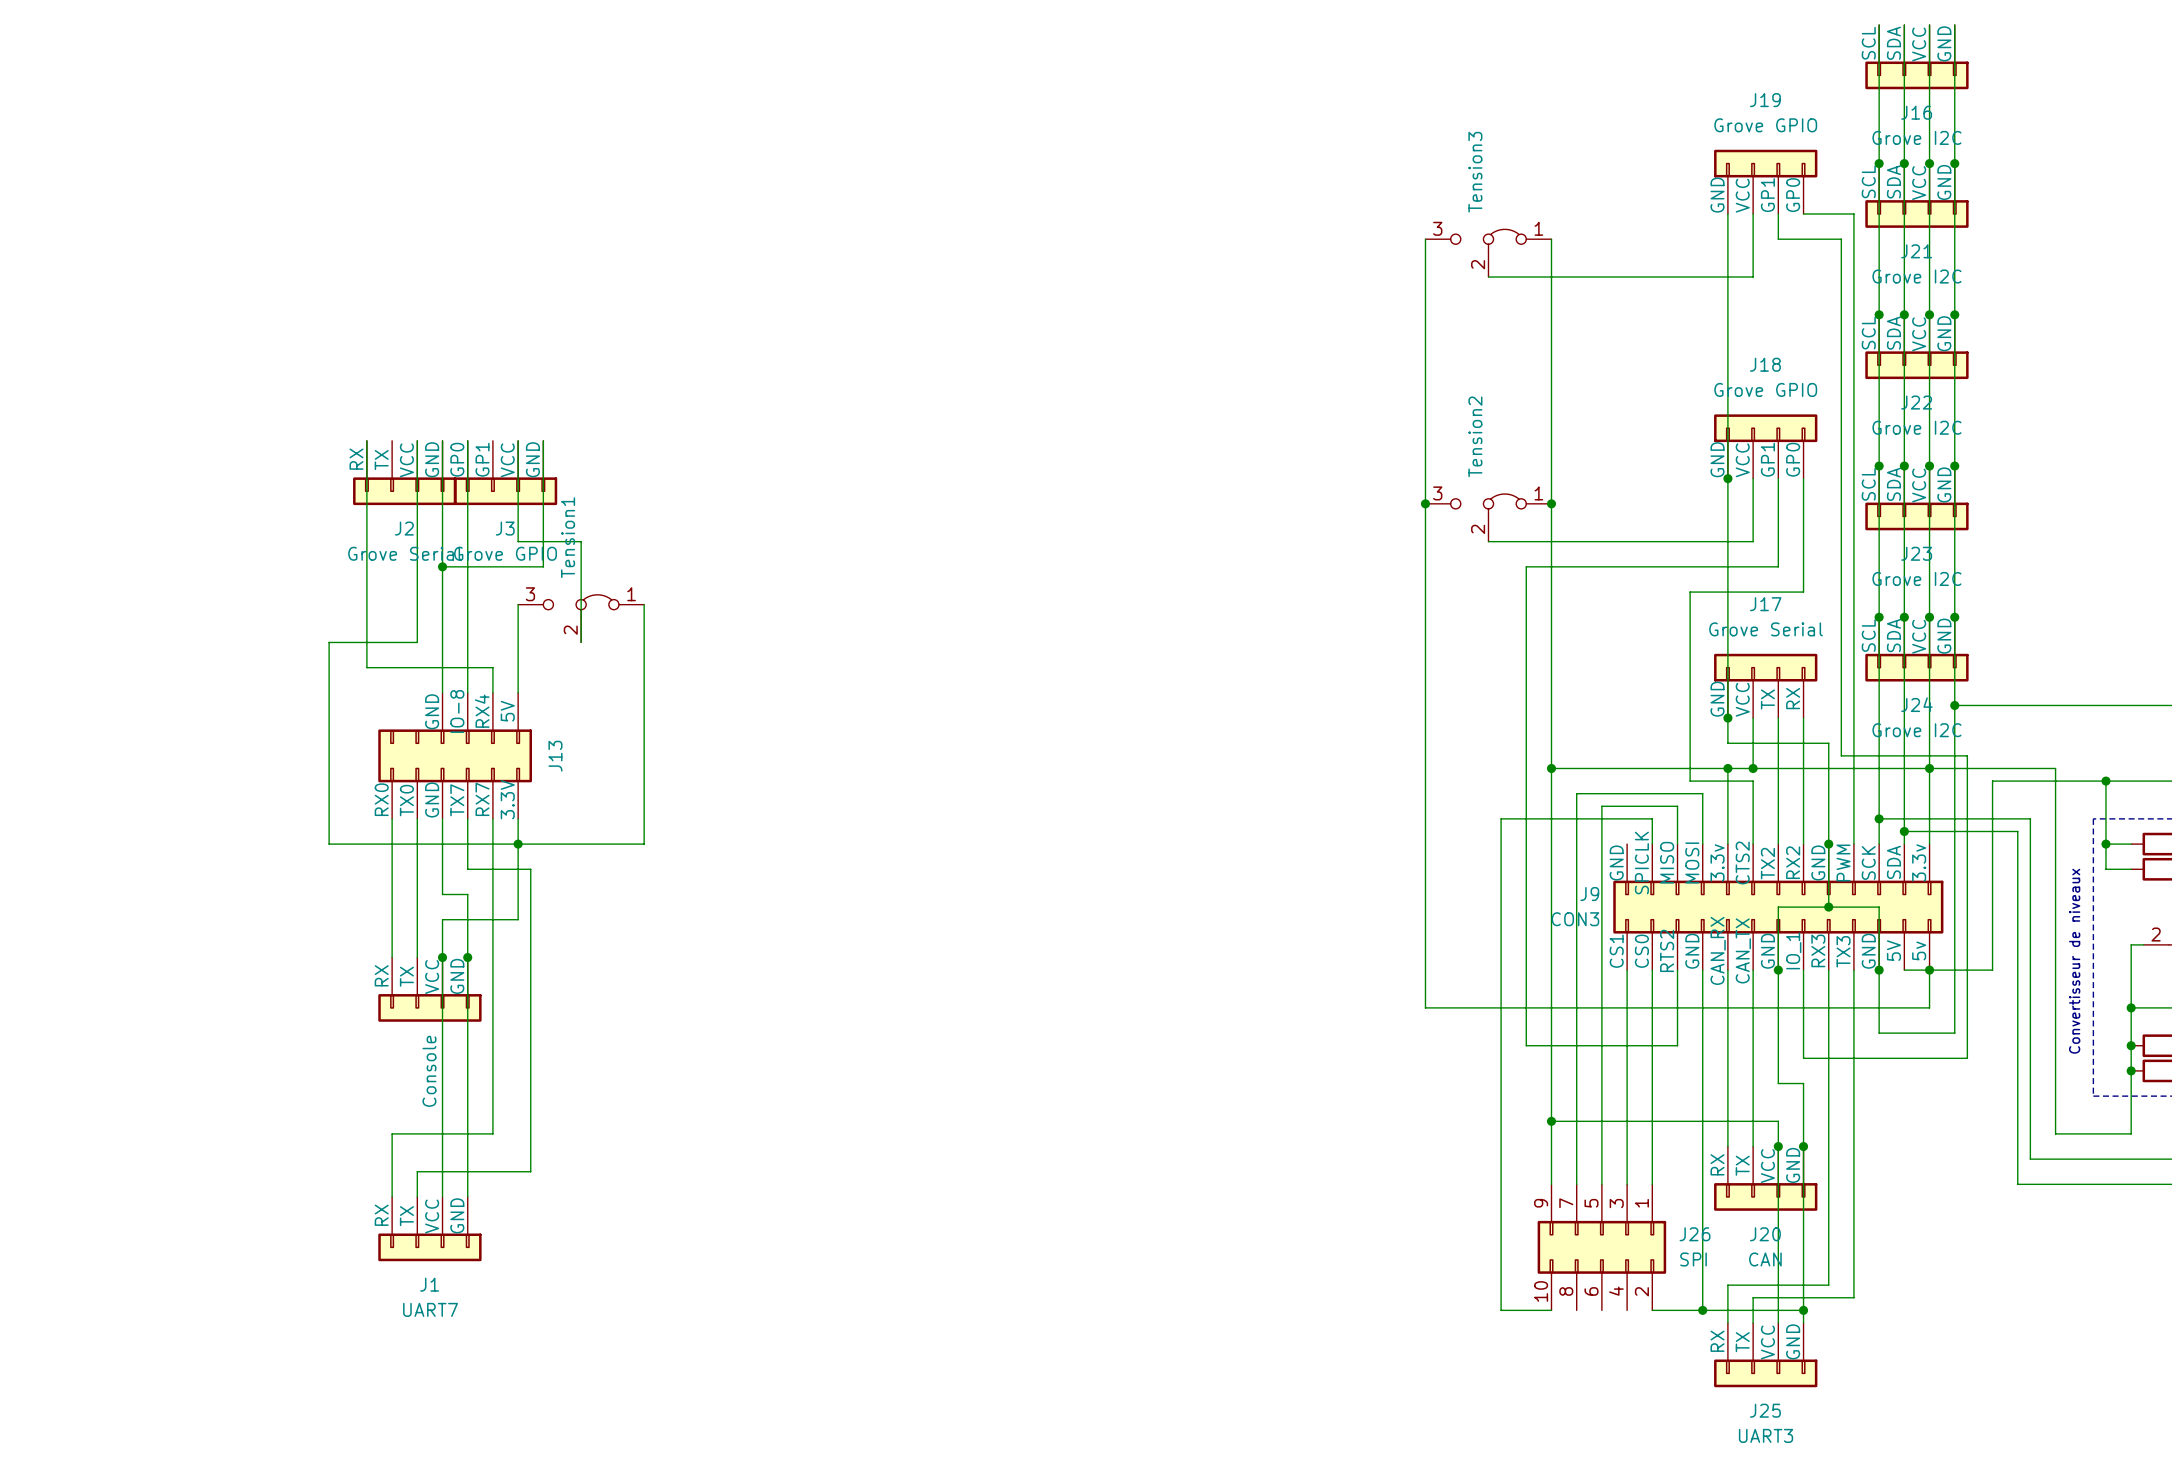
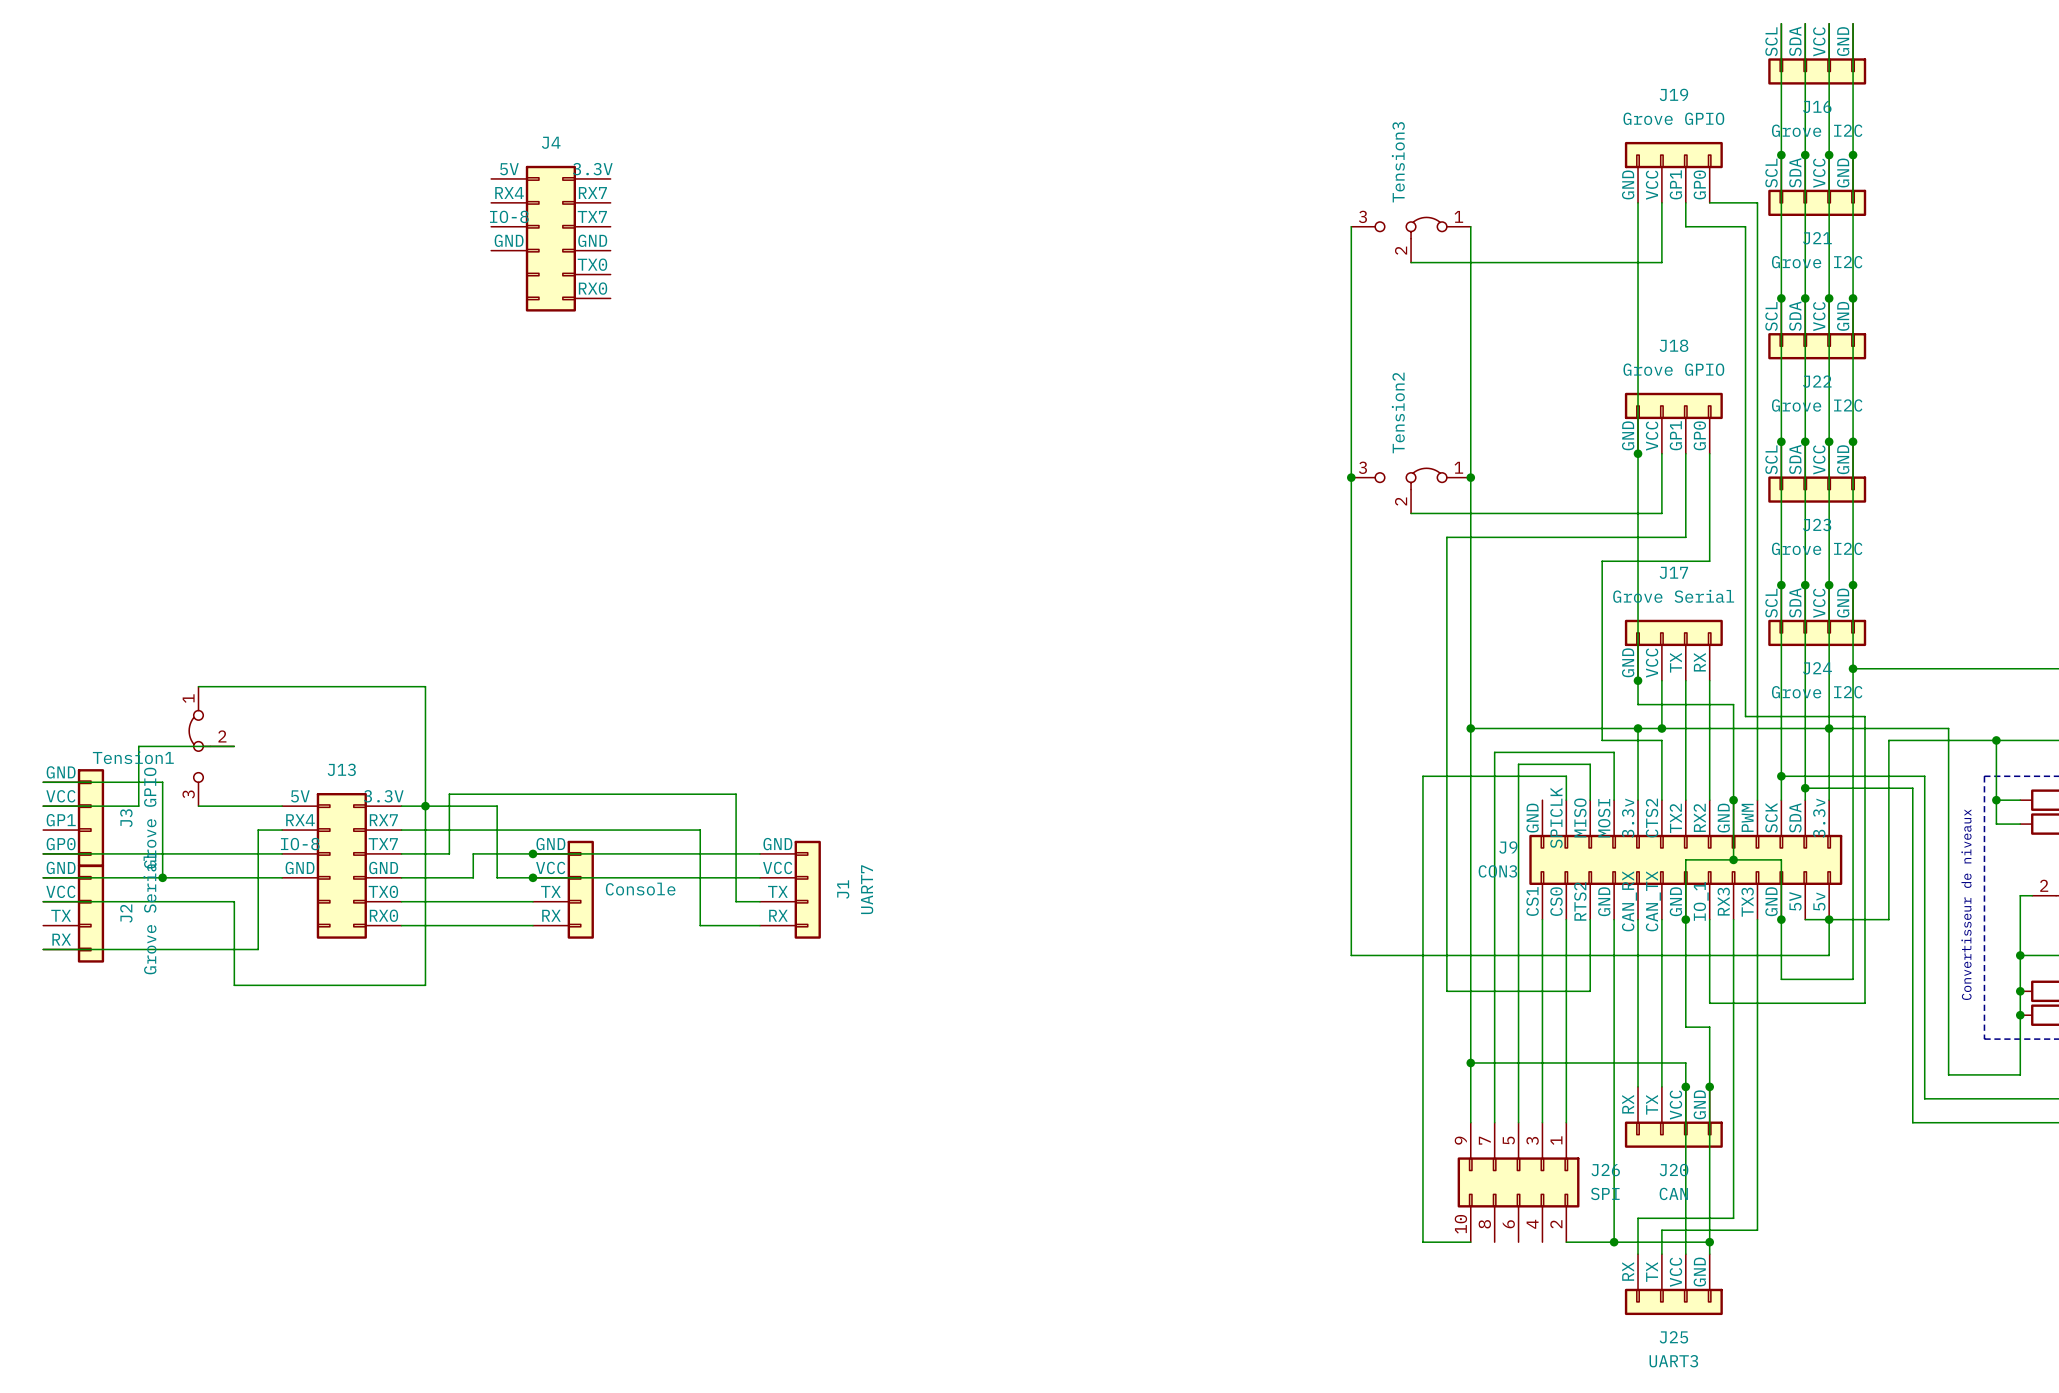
J4: none -> (550, 238)
wire: (366, 440) (366, 667) (492, 667) (492, 692) -> none
wire: (417, 440) (417, 642) (329, 642) (329, 844) (644, 844) (644, 604) -> none
wire: (442, 440) (442, 692) -> none
wire: (467, 440) (467, 692) -> none
wire: (518, 440) (518, 541) (581, 541) (581, 642) -> none
wire: (543, 440) (543, 566) (442, 566) -> none
J2 position: (404, 472) -> (73, 913)
J3 position: (505, 472) -> (73, 818)
J2 rotation: 0° (404, 491) -> 90° counterclockwise (90, 913)
J3 rotation: 0° (505, 491) -> 90° counterclockwise (90, 818)
junction: (442, 566) -> none
wire: (518, 604) (518, 692) -> none
Tension1 rotation: 0° (581, 606) -> 90° counterclockwise (199, 746)
Tension1 position: (581, 618) -> (211, 746)
wire: none -> (198, 686) (425, 686) (425, 985) (234, 985) (234, 901) (43, 901)
J13 rotation: 0° (455, 755) -> 90° counterclockwise (341, 865)
J13 position: (455, 755) -> (341, 865)
wire: none -> (234, 746) (138, 746) (138, 806) (43, 806)
wire: (392, 818) (392, 957) -> none
wire: (417, 818) (417, 957) -> none
wire: (442, 818) (442, 894) (467, 894) (467, 1196) -> none
wire: (467, 818) (467, 869) (530, 869) (530, 1171) (417, 1171) (417, 1196) -> none
wire: (492, 818) (492, 1133) (392, 1133) (392, 1196) -> none
wire: (518, 818) (518, 919) (442, 919) (442, 1196) -> none
wire: none -> (43, 782) (162, 782) (162, 877)
junction: (518, 844) -> none
wire: none -> (198, 806) (282, 806)
wire: none -> (401, 806) (497, 806) (497, 877) (759, 877)
junction: none -> (425, 806)
wire: none -> (282, 830) (258, 830) (258, 949) (43, 949)
wire: none -> (401, 830) (700, 830) (700, 925) (759, 925)
wire: none -> (43, 853) (282, 853)
wire: none -> (401, 853) (449, 853) (449, 794) (736, 794) (736, 901) (759, 901)
junction: none -> (532, 853)
wire: none -> (759, 853) (473, 853) (473, 877) (401, 877)
wire: none -> (43, 877) (282, 877)
junction: none -> (162, 877)
junction: none -> (532, 877)
wire: none -> (401, 901) (532, 901)
junction: (442, 957) -> none
junction: (467, 957) -> none
wire: none -> (401, 925) (532, 925)
Console position: (429, 989) -> (563, 889)
Console rotation: 0° (429, 1007) -> 90° counterclockwise (580, 889)
J1 position: (429, 1229) -> (790, 889)
J1 rotation: 0° (429, 1247) -> 90° counterclockwise (807, 889)

